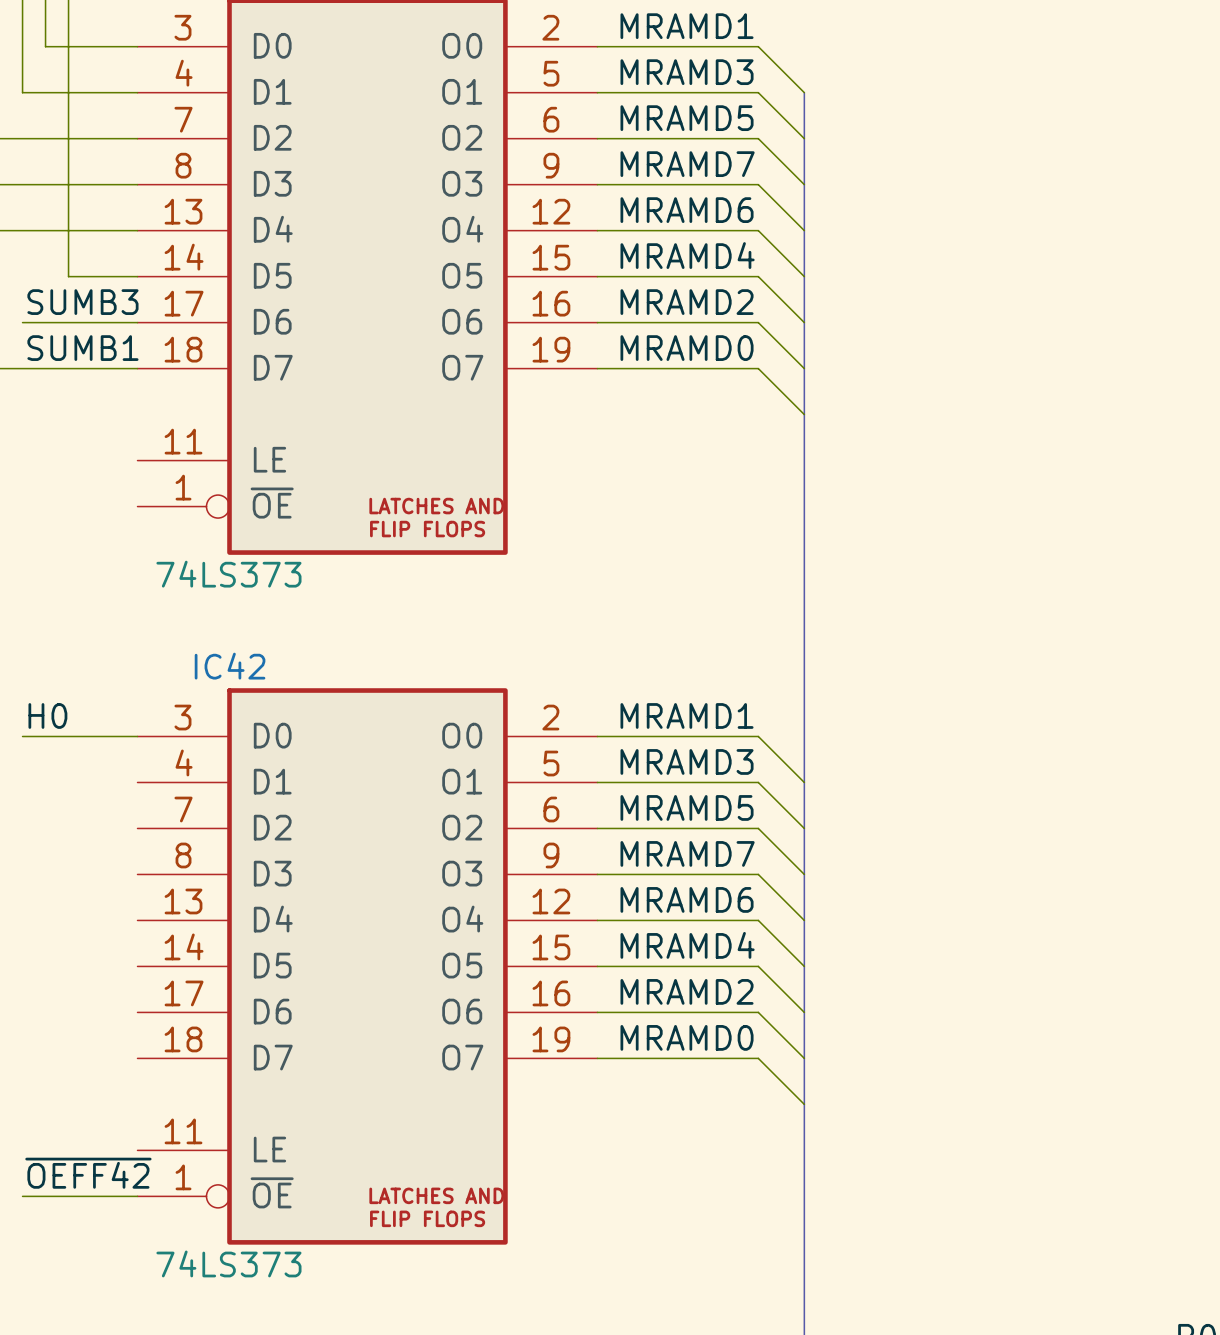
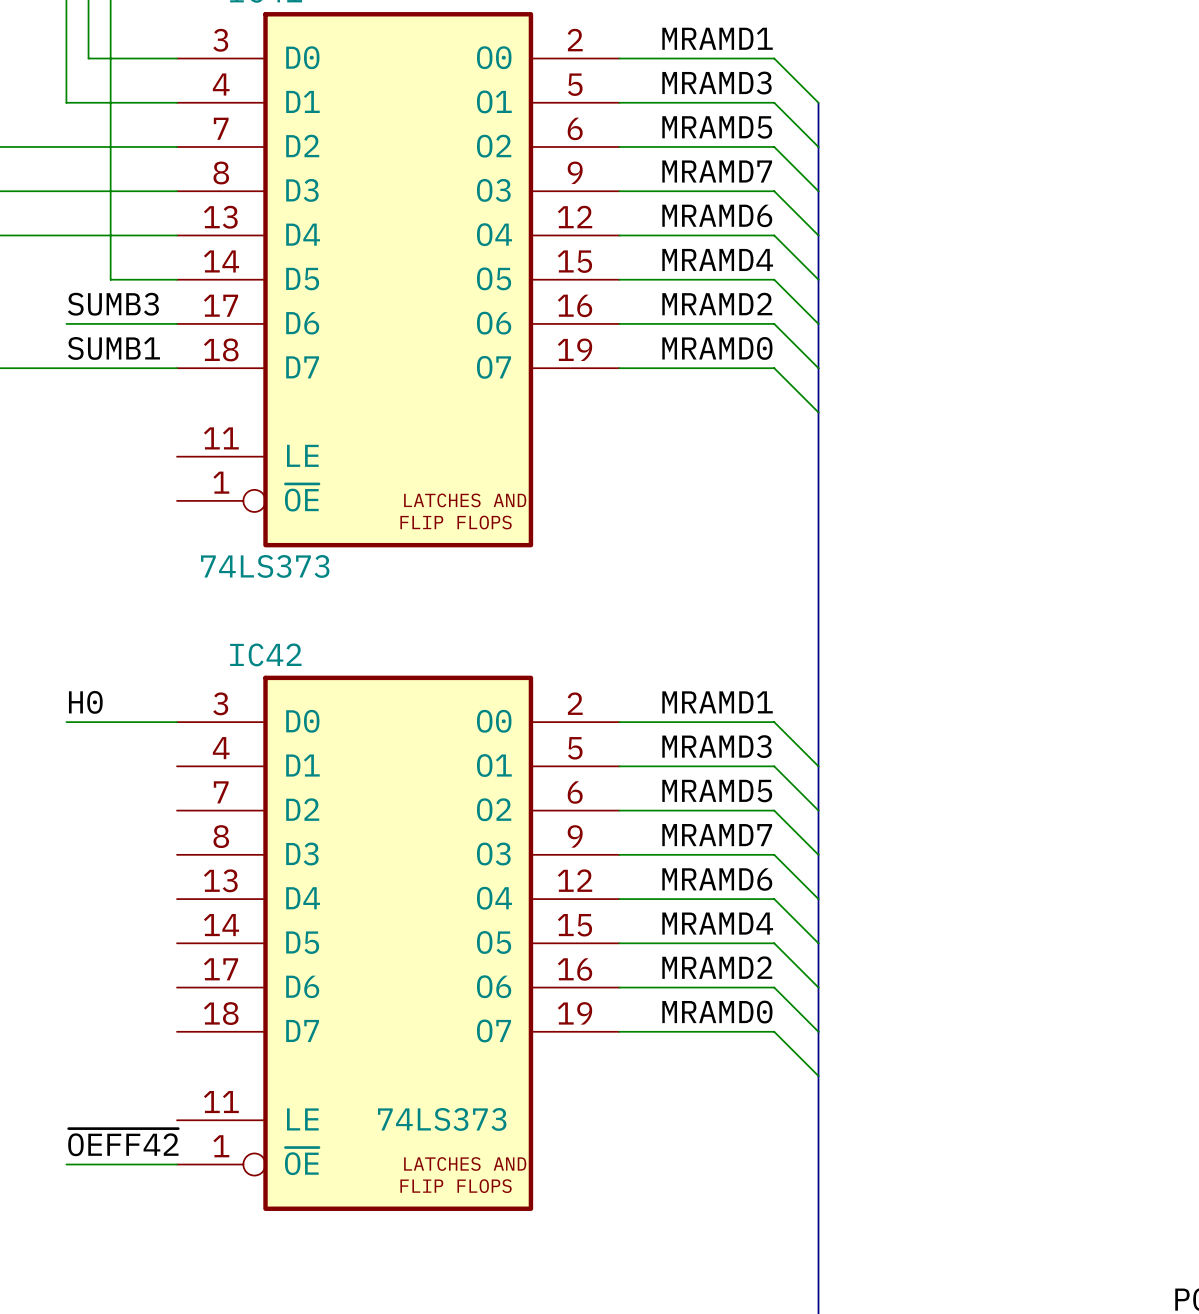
IC42 value position: 74LS373 (228, 1263) -> 74LS373 (442, 1119)

